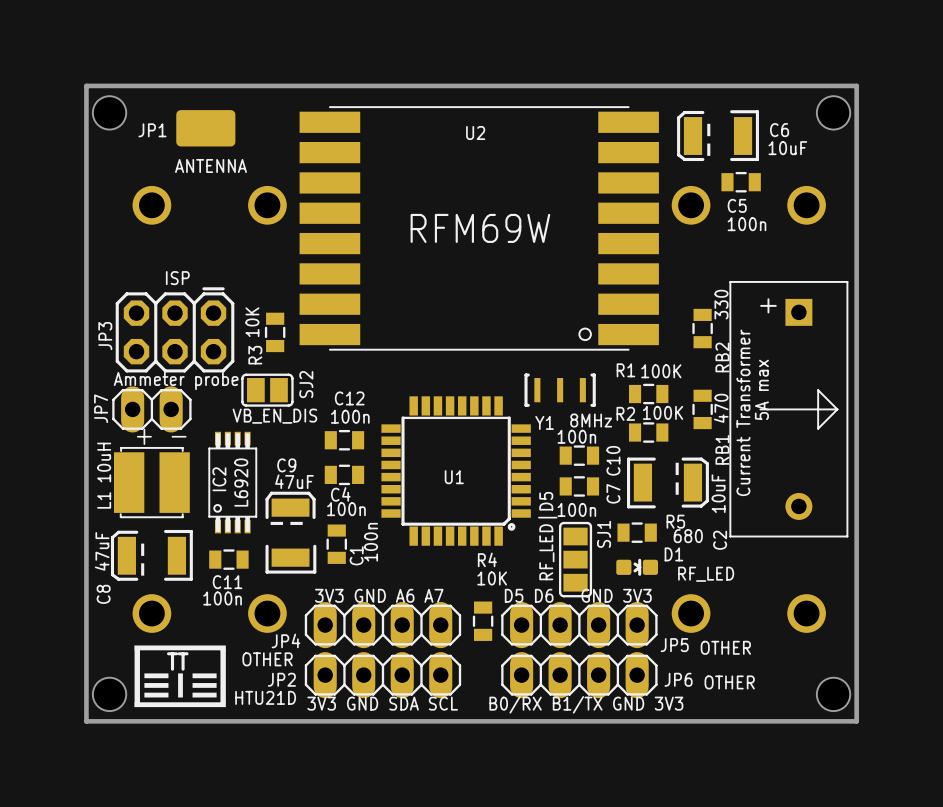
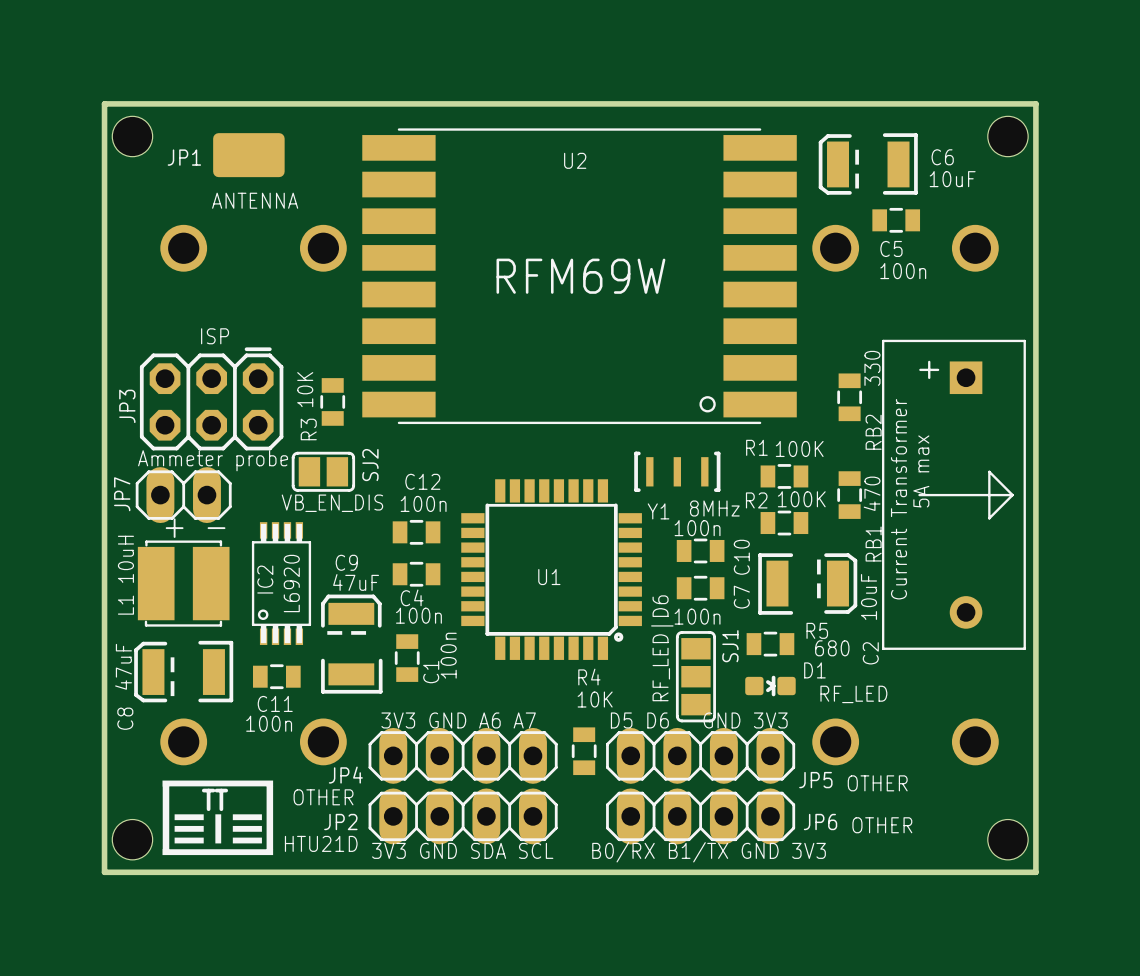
text: RF_LED|D5 (547, 536) -> RF_LED|D6 (662, 648)

